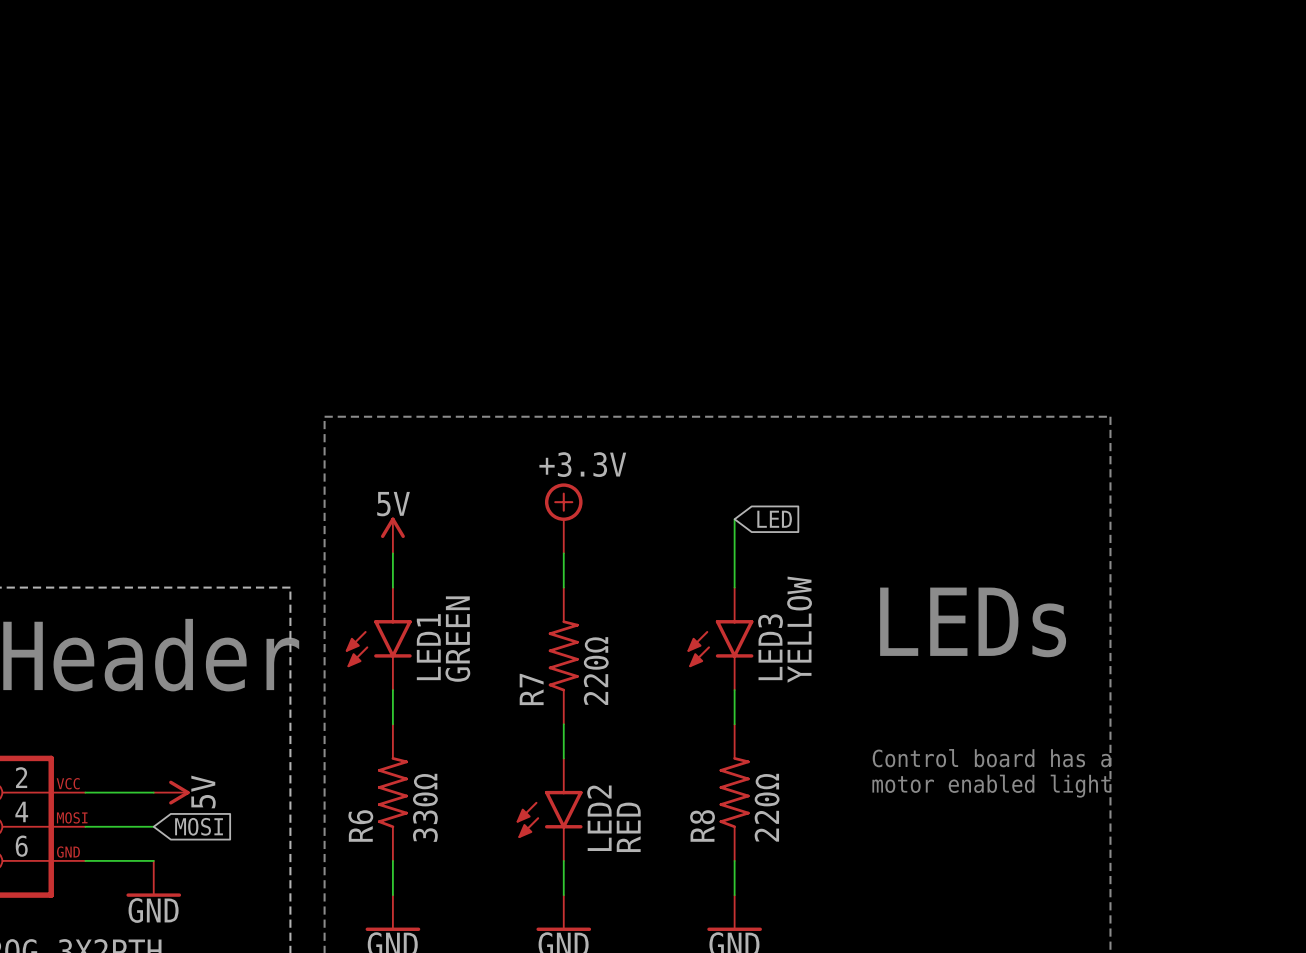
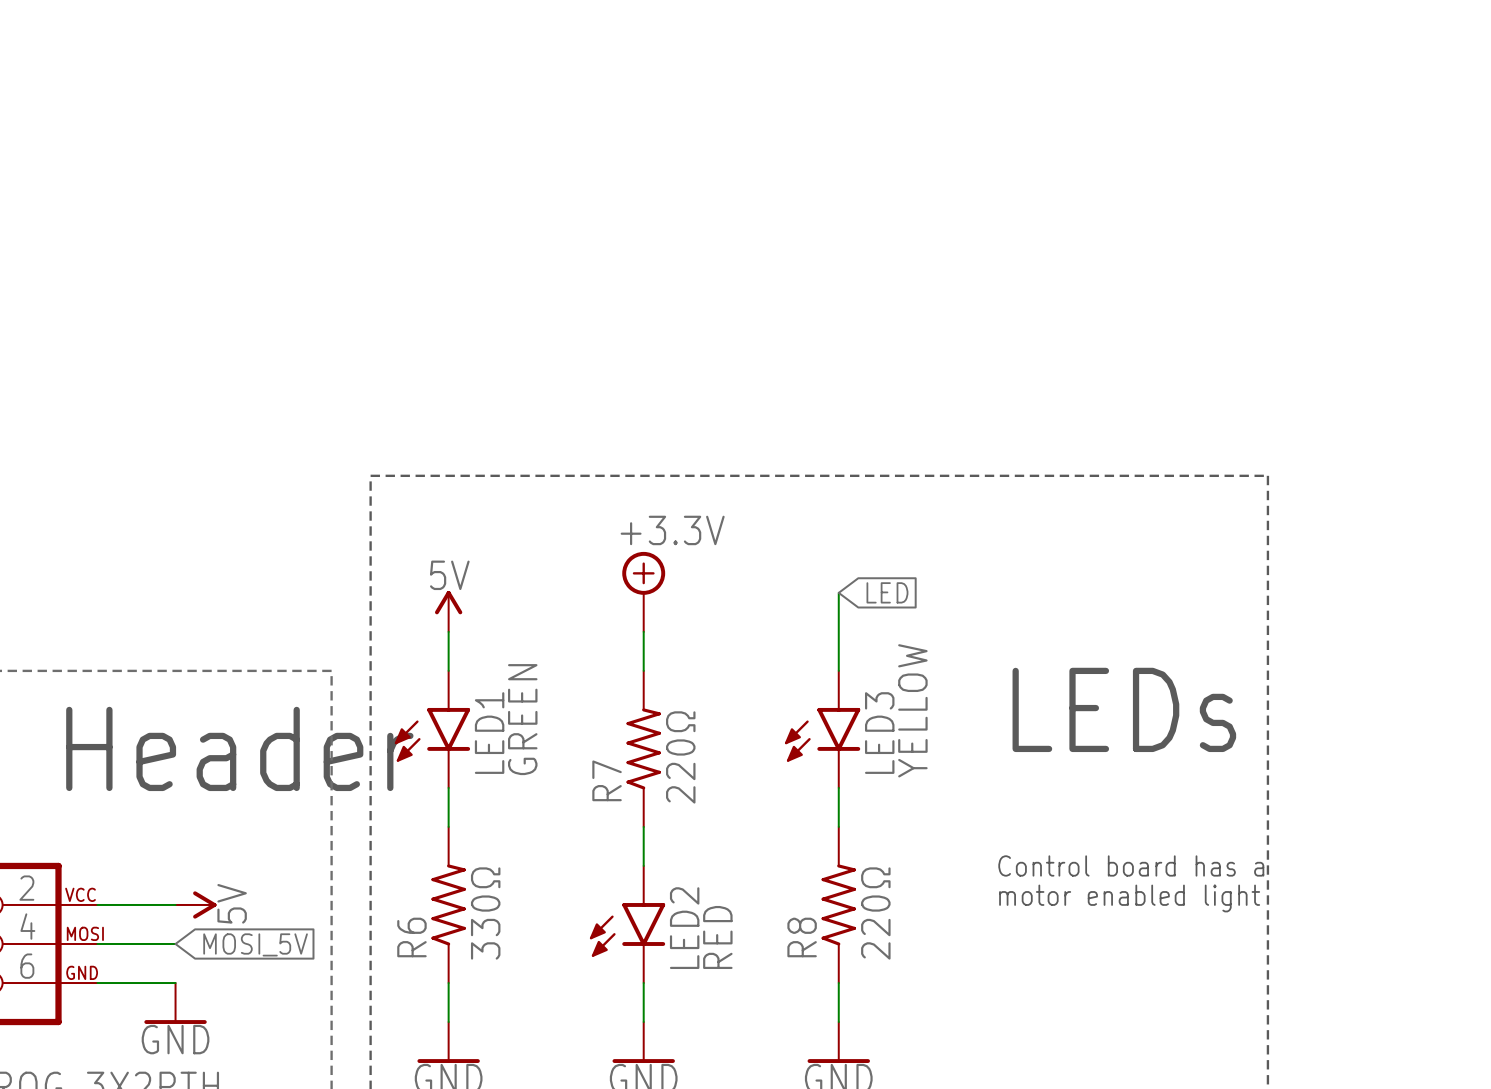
global label: MOSI (199, 826) -> MOSI_5V (255, 944)

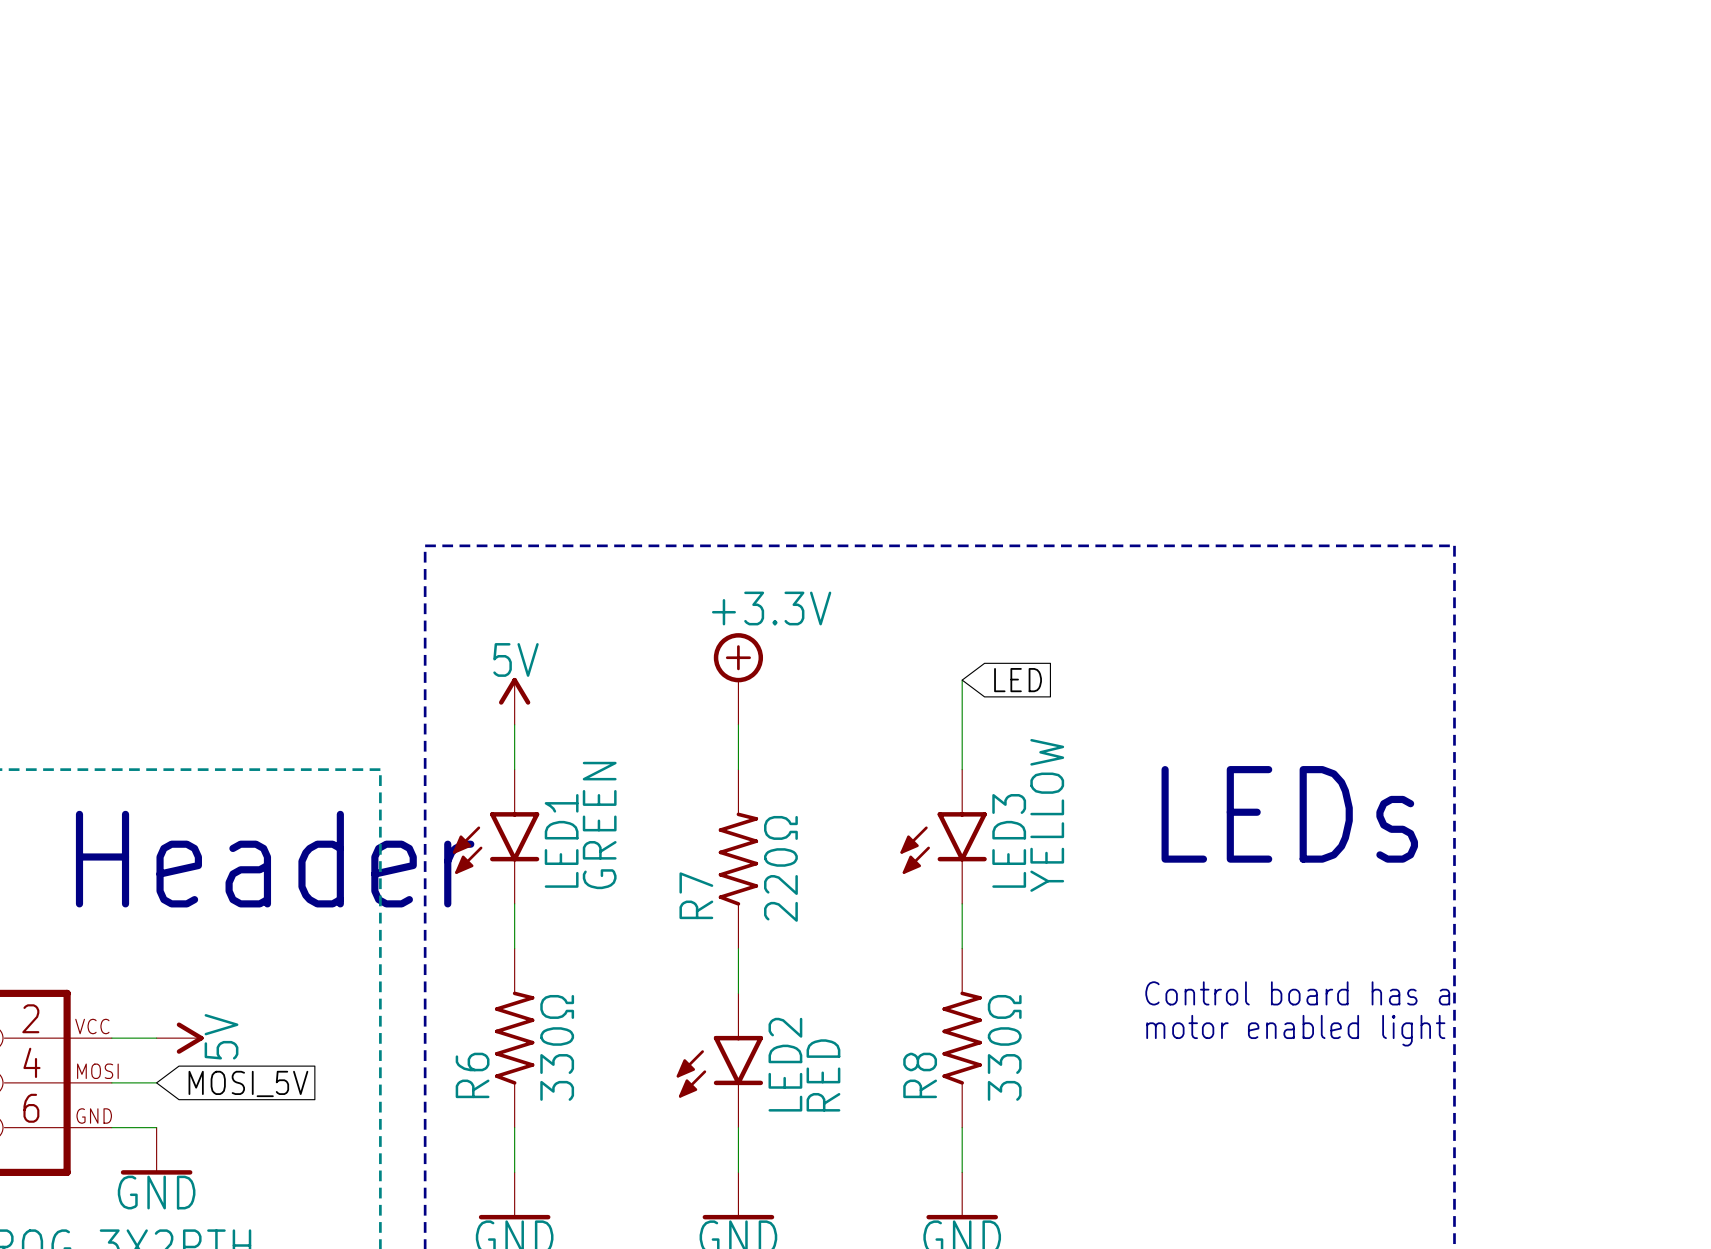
power symbol position: 5V (196, 904) -> 5V (180, 1038)
R8 value: 220Ω (875, 913) -> 330Ω (1004, 1047)
wire: (136, 943) (175, 943) -> none
global label position: MOSI_5V (255, 944) -> MOSI_5V (248, 1083)
wire: (136, 983) (175, 983) -> none
power symbol position: GND (175, 1003) -> GND (156, 1151)

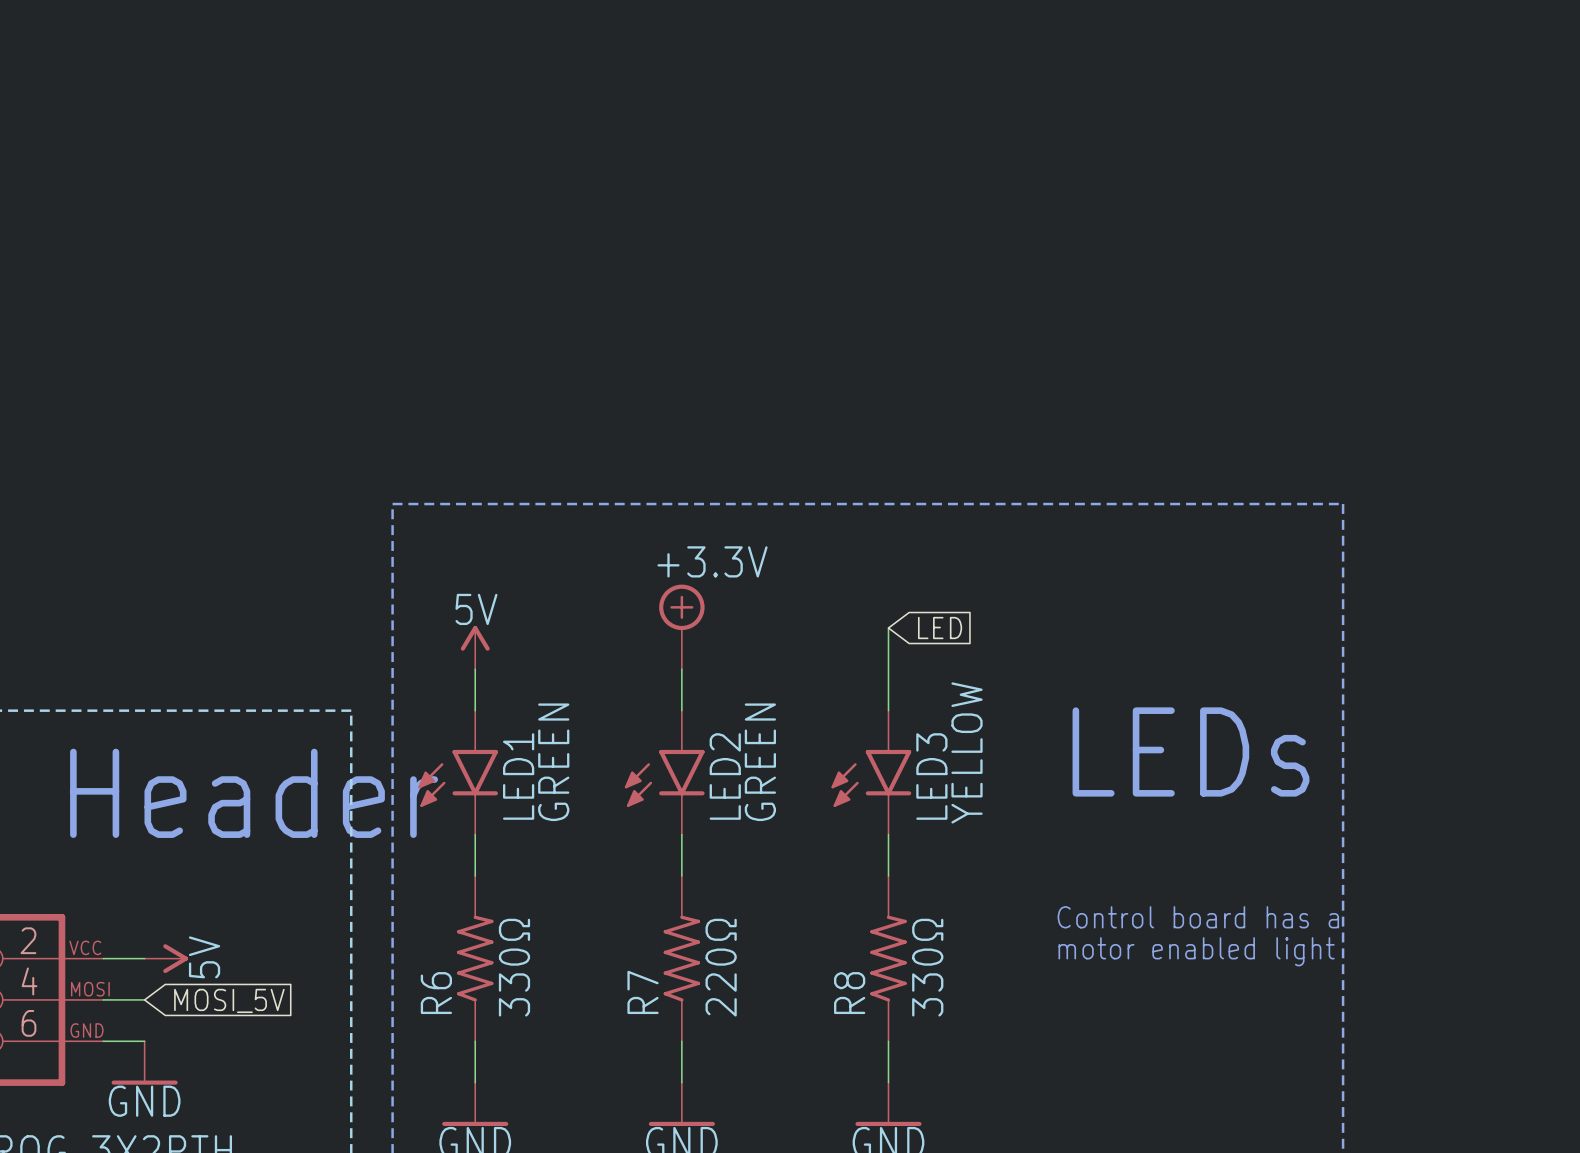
R7 position: (738, 859) -> (681, 958)
LED2 position: (719, 1060) -> (664, 772)
LED2 value: RED (823, 1075) -> GREEN (760, 762)

